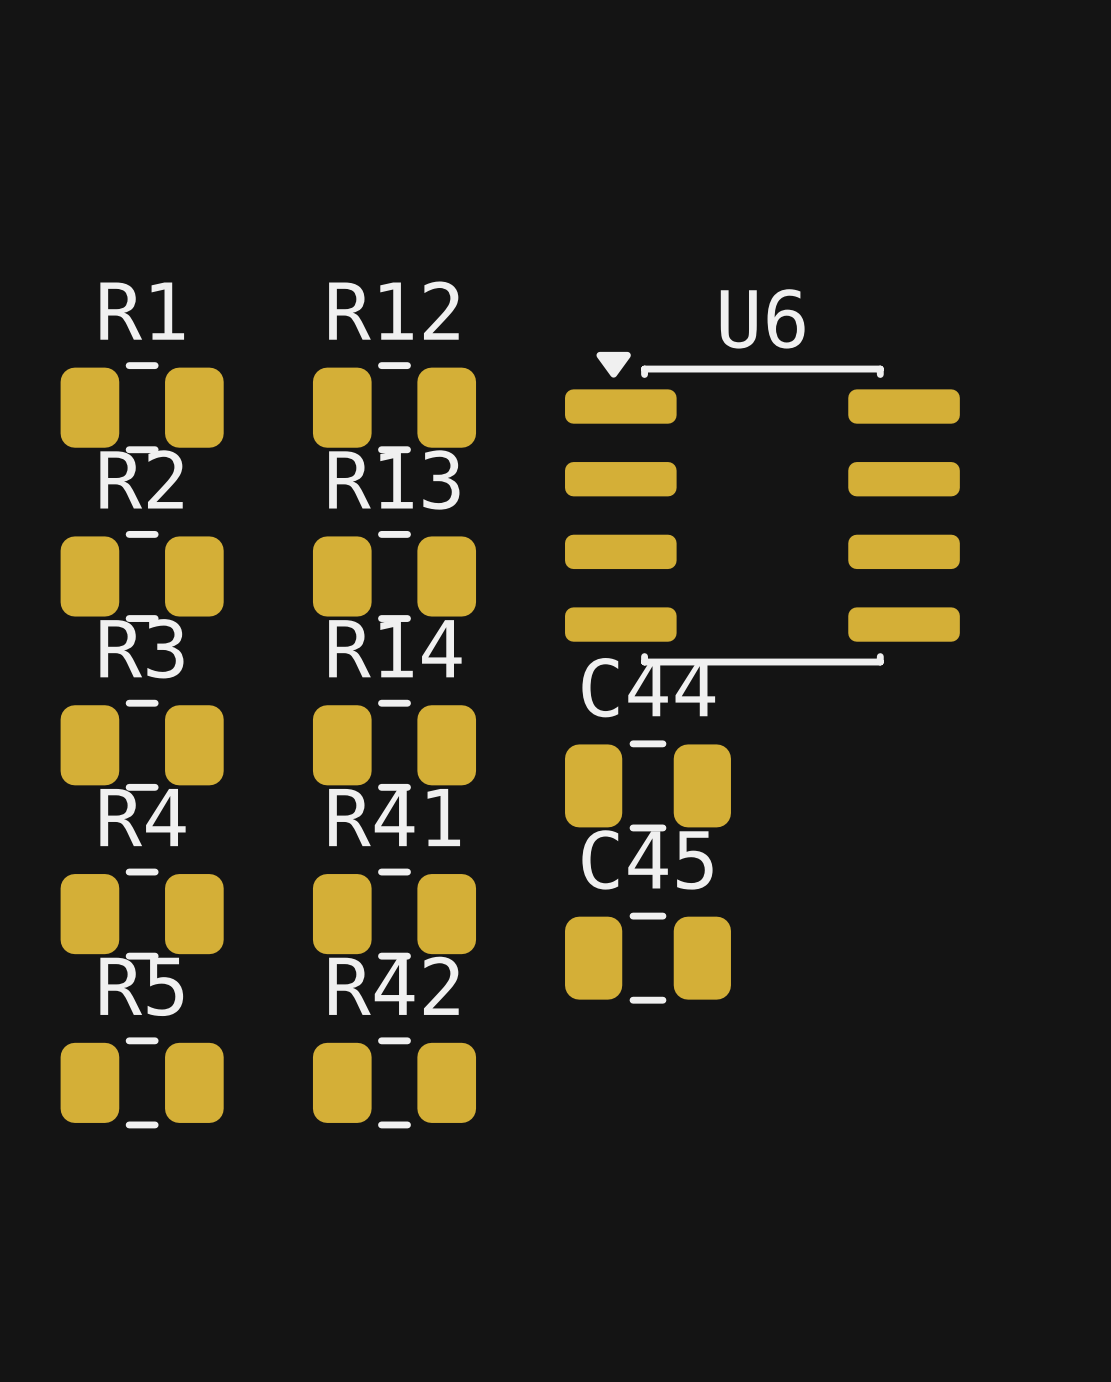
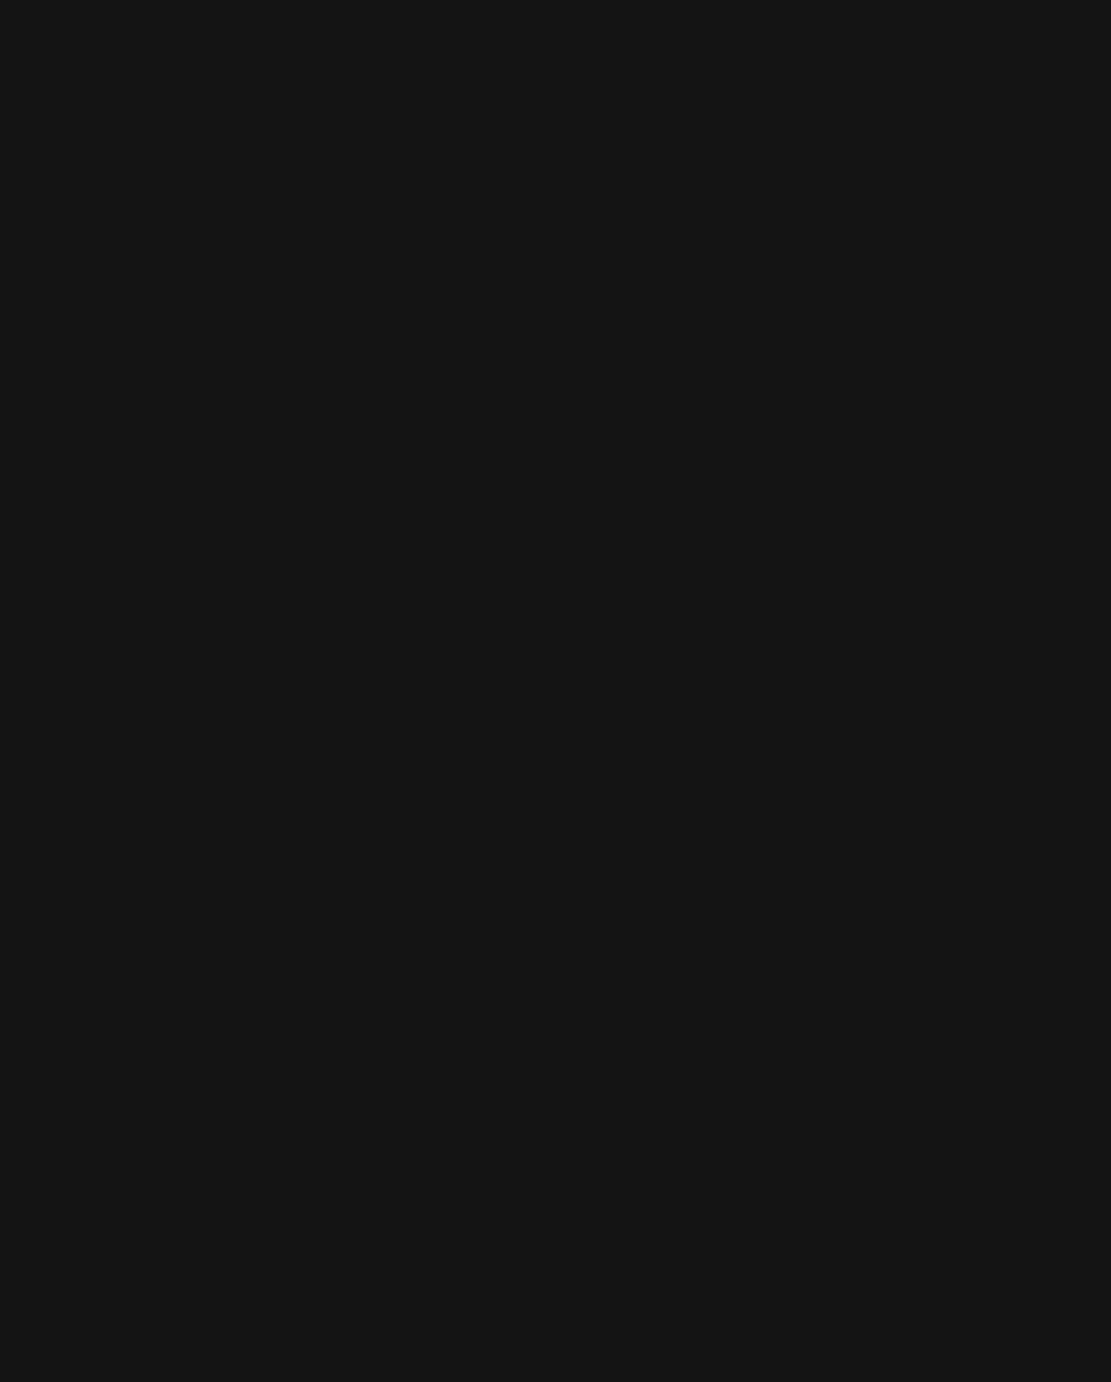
R1: (142, 407) -> none
R12: (394, 407) -> none
U6: (762, 508) -> none
R2: (142, 576) -> none
R13: (394, 576) -> none
R3: (142, 745) -> none
R14: (394, 745) -> none
C44: (647, 785) -> none
R4: (142, 914) -> none
R41: (394, 914) -> none
C45: (647, 958) -> none
R5: (142, 1082) -> none
R42: (394, 1082) -> none

